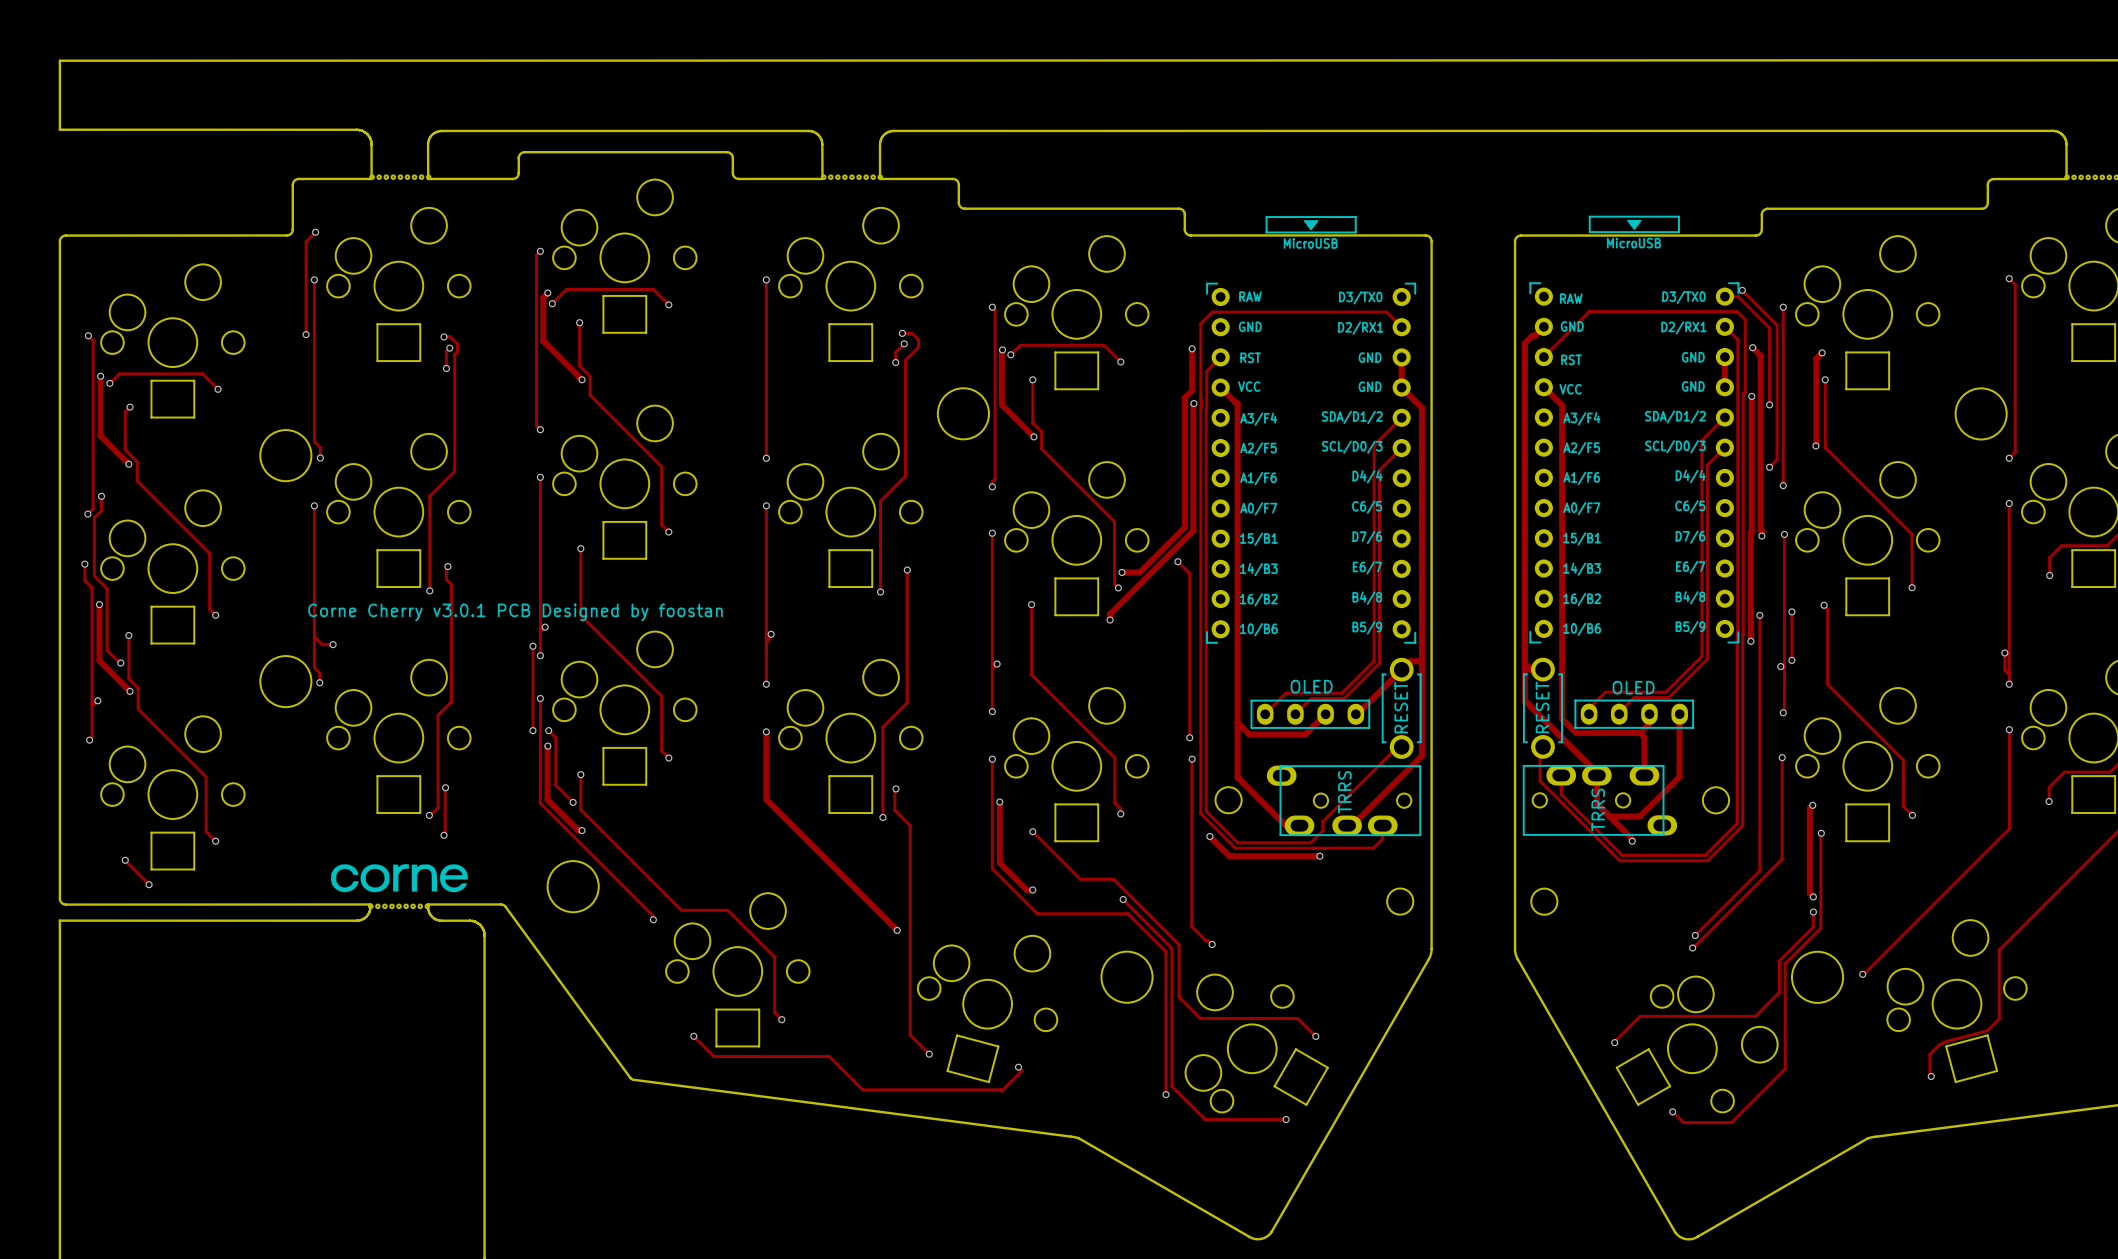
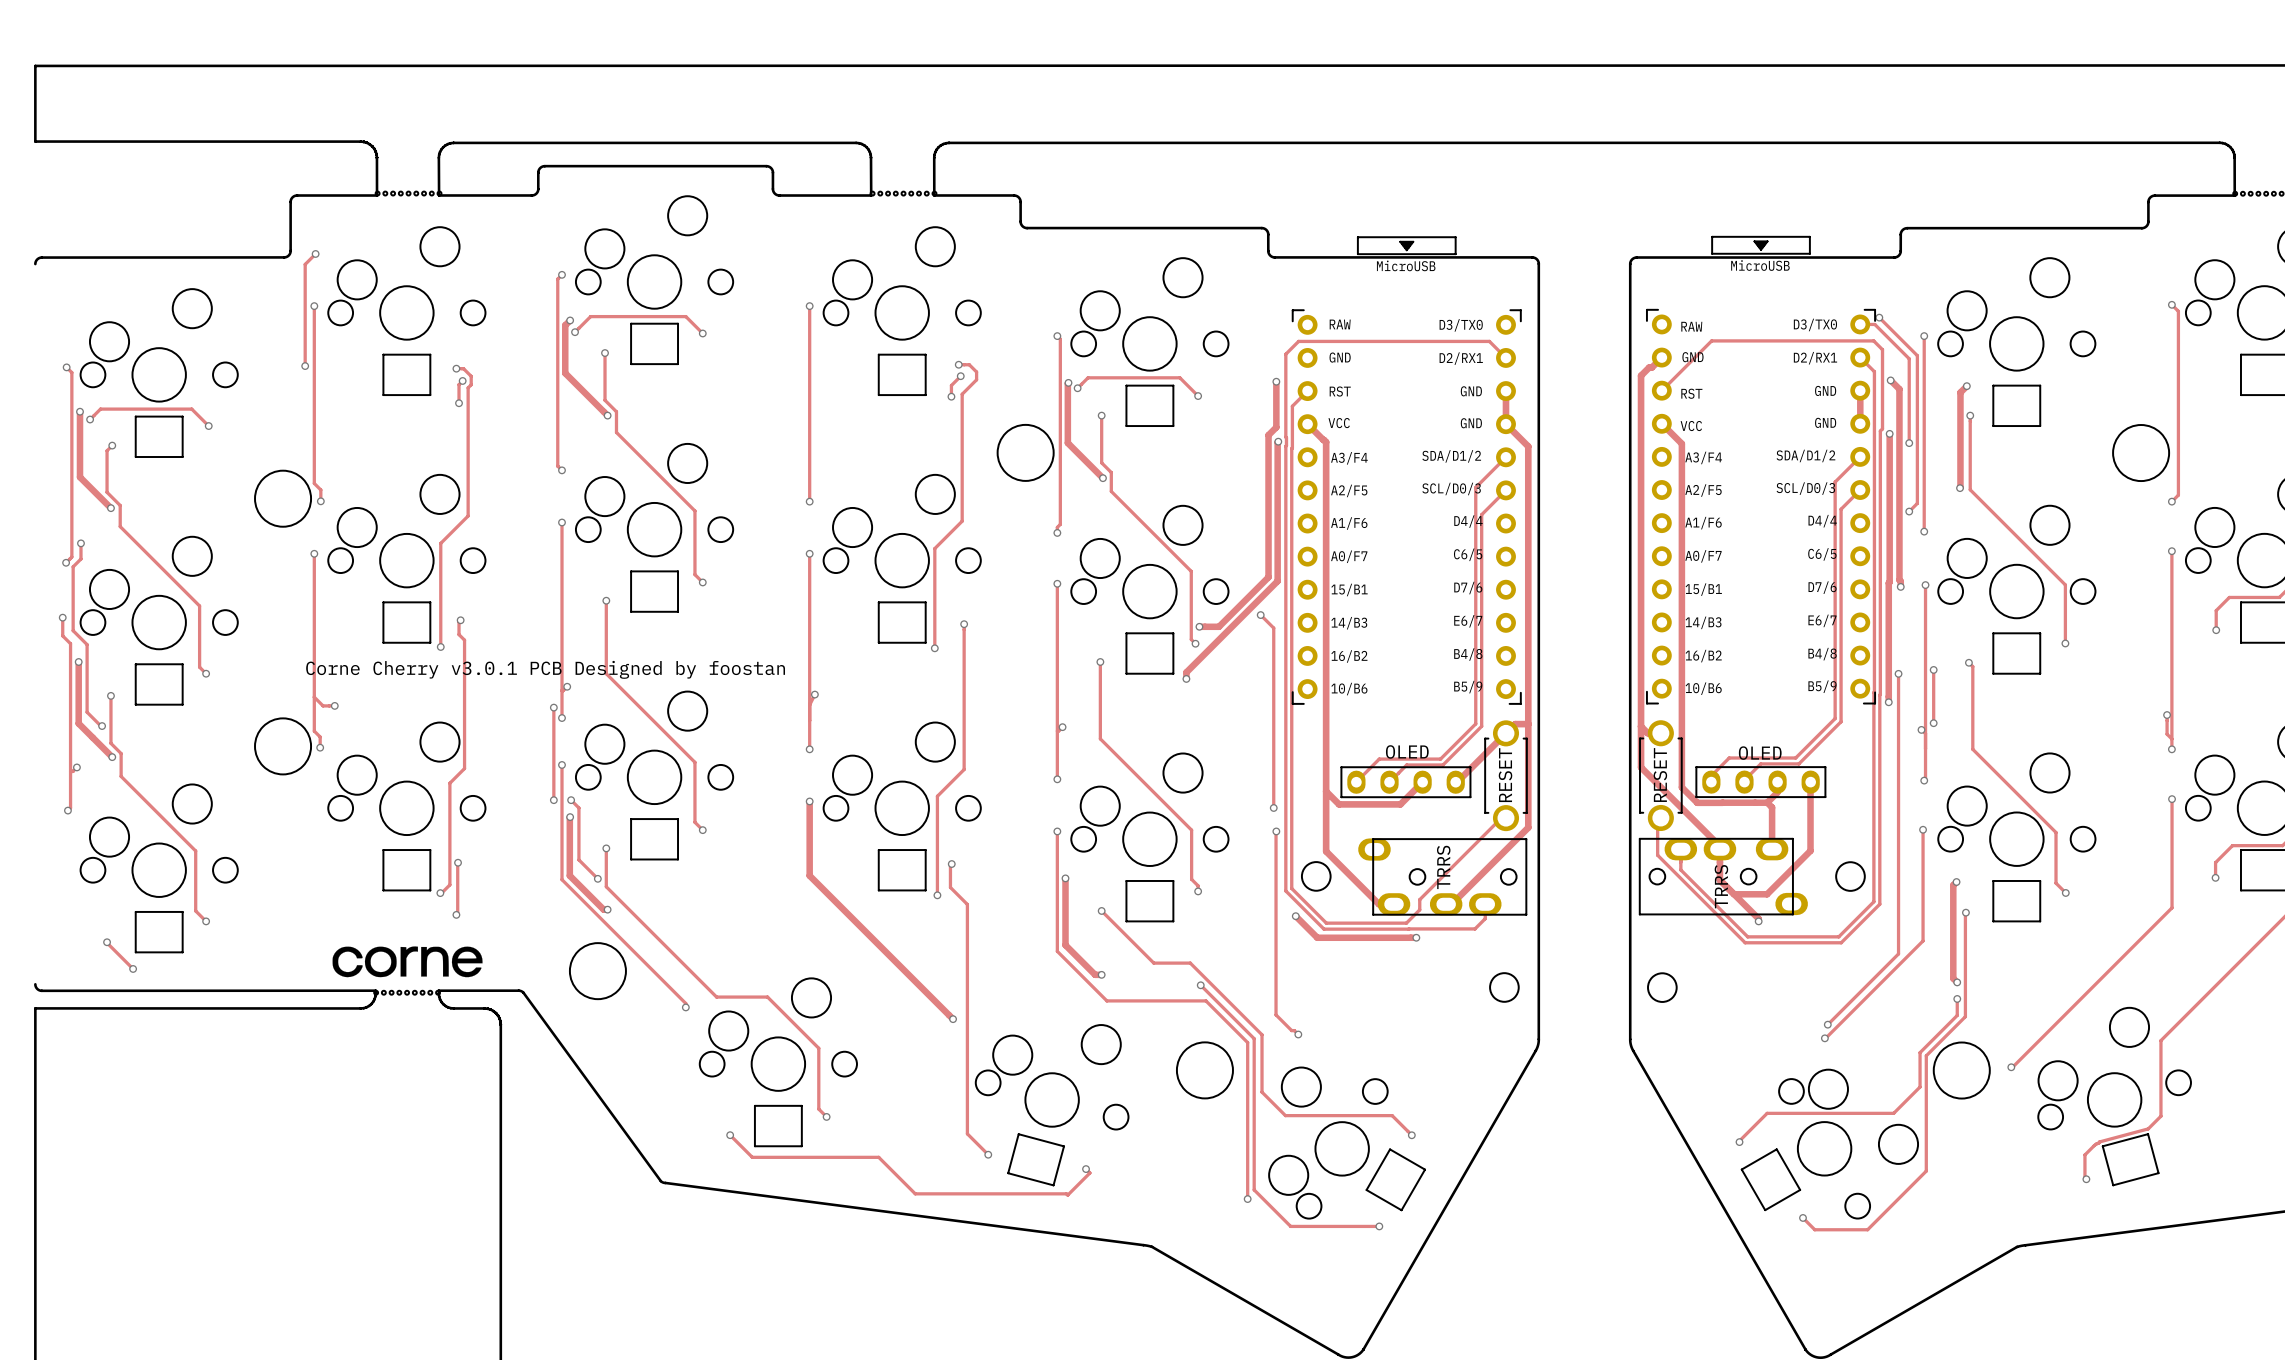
board edge: (59, 241) (59, 898) -> none

